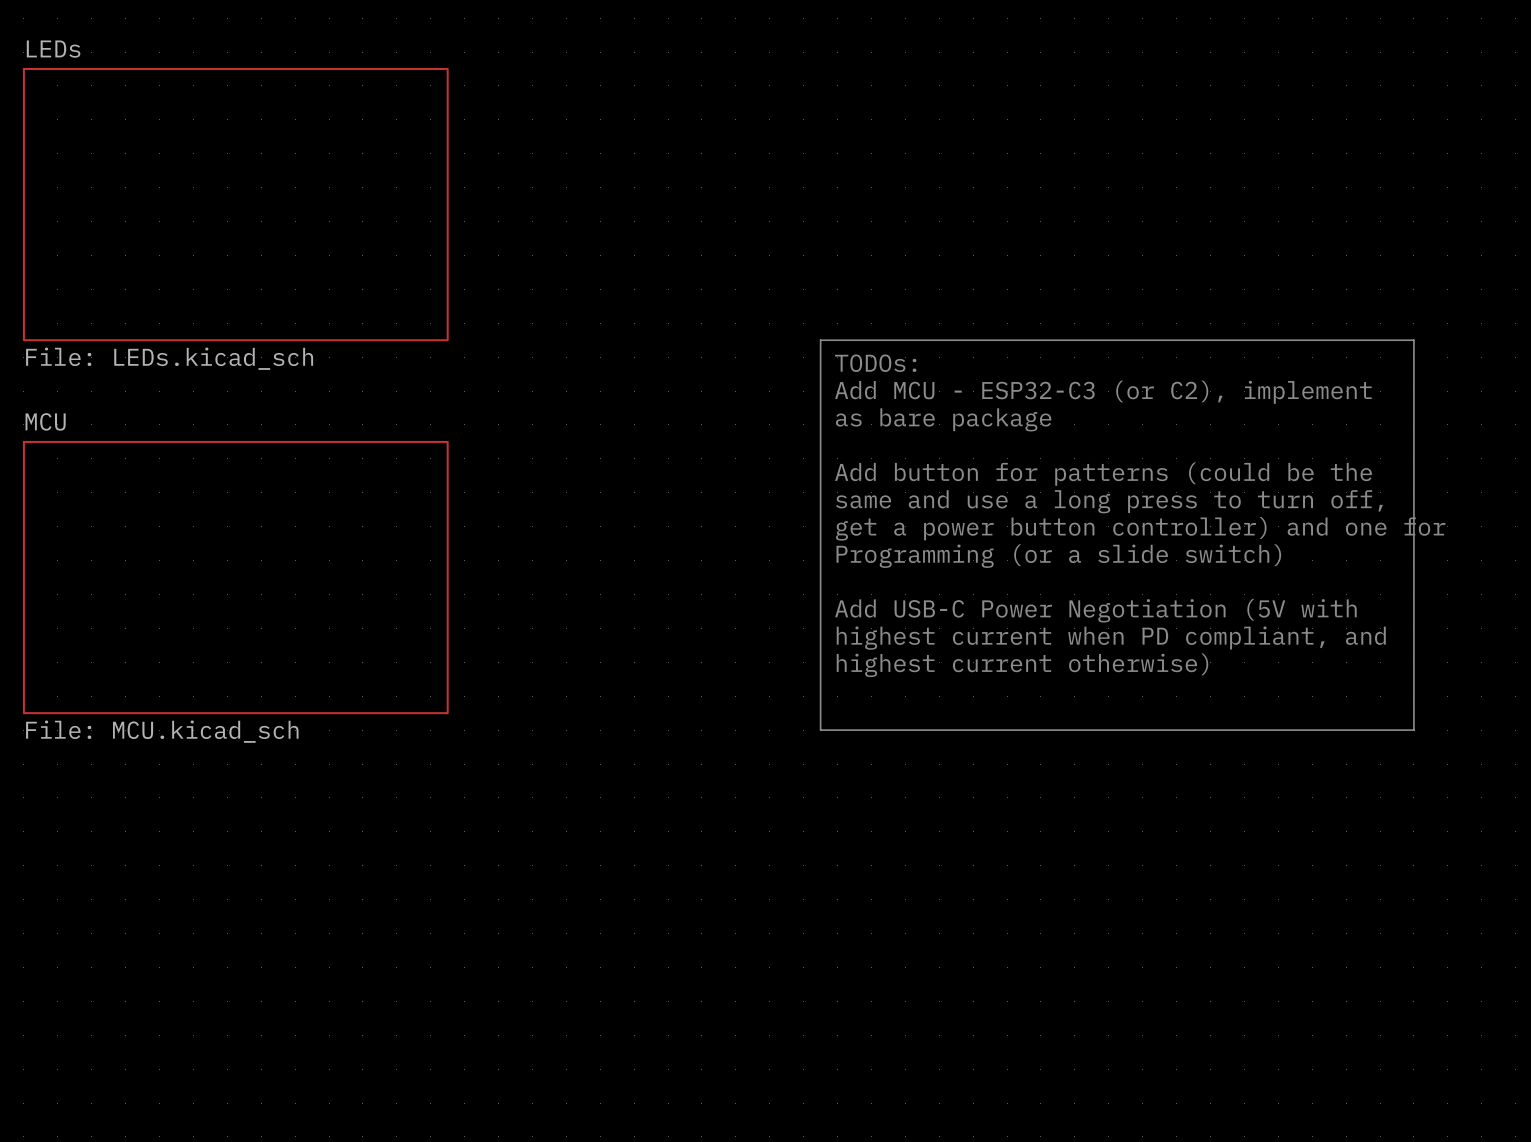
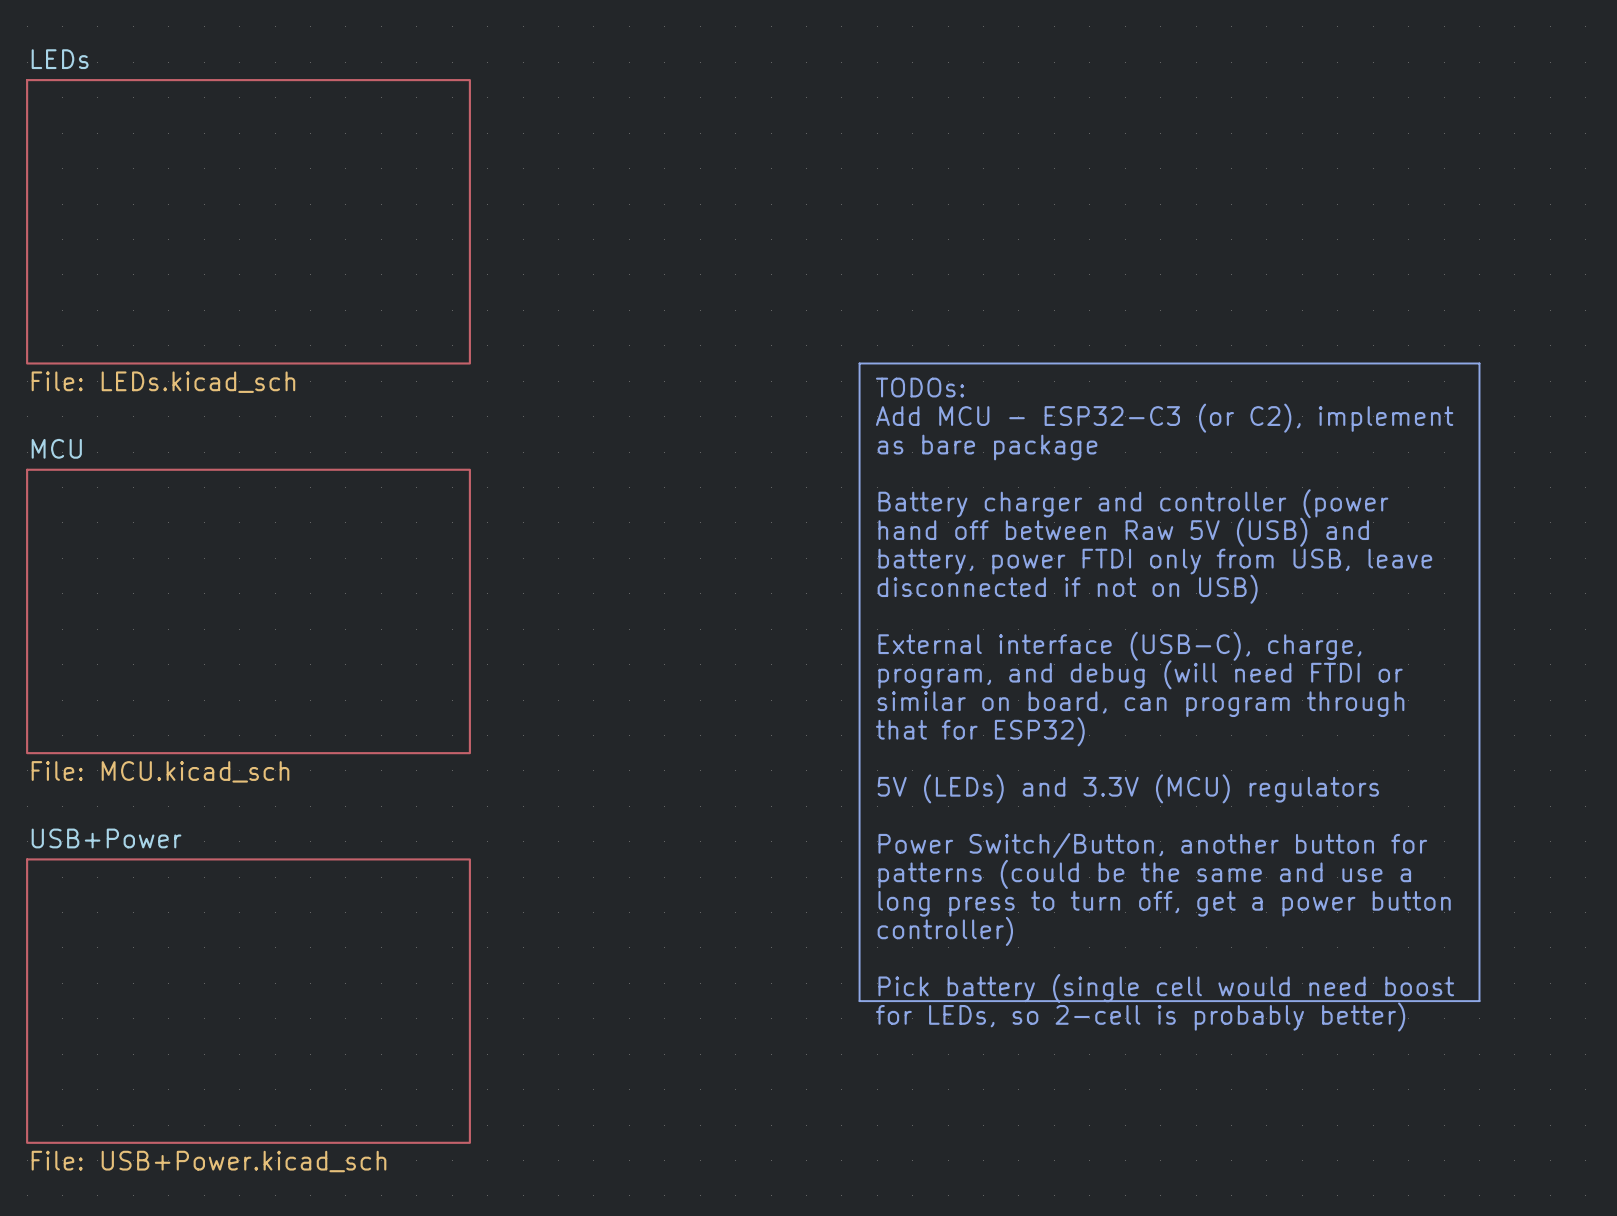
text: Add button for patterns (could be the (1103, 474) -> Battery charger and controller (power (1133, 503)
text: same and use a long press to turn off, (1109, 501) -> hand off between Raw 5V (USB) and (1123, 532)
text: get a power button controller) and one for (1140, 528) -> battery, power FTDI only from USB, leave (1155, 561)
text: Programming (or a slide switch) (1058, 556) -> disconnected if not on USB) (1067, 589)
text: Add USB-C Power Negotiation (5V with (1095, 610) -> External interface (USB-C), charge, (1119, 646)
text: highest current when PD compliant, and (1111, 638) -> program, and debug (will need FTDI or (1140, 674)
text: highest current otherwise) (1022, 665) -> similar on board, can program through (1140, 704)
text: none -> that for ESP32) (980, 731)
line: (820, 730) (1413, 730) -> (859, 770) (859, 1001) (1479, 1001) (1479, 770)
text: none -> 5V (LEDs) and 3.3V (MCU) regulators (1128, 788)
text: none -> Power Switch/Button, another button for (1152, 845)
text: none -> patterns (could be the same and use a (1144, 874)
text: none -> long press to turn off, get a power button (1164, 903)
text: none -> controller) (945, 931)
text: none -> Pick battery (single cell would need boost (1166, 988)
sheet USB+Power: none -> File: USB+Power.kicad_sch (248, 1001)
text: none -> for LEDs, so 2-cell is probably better) (1140, 1017)

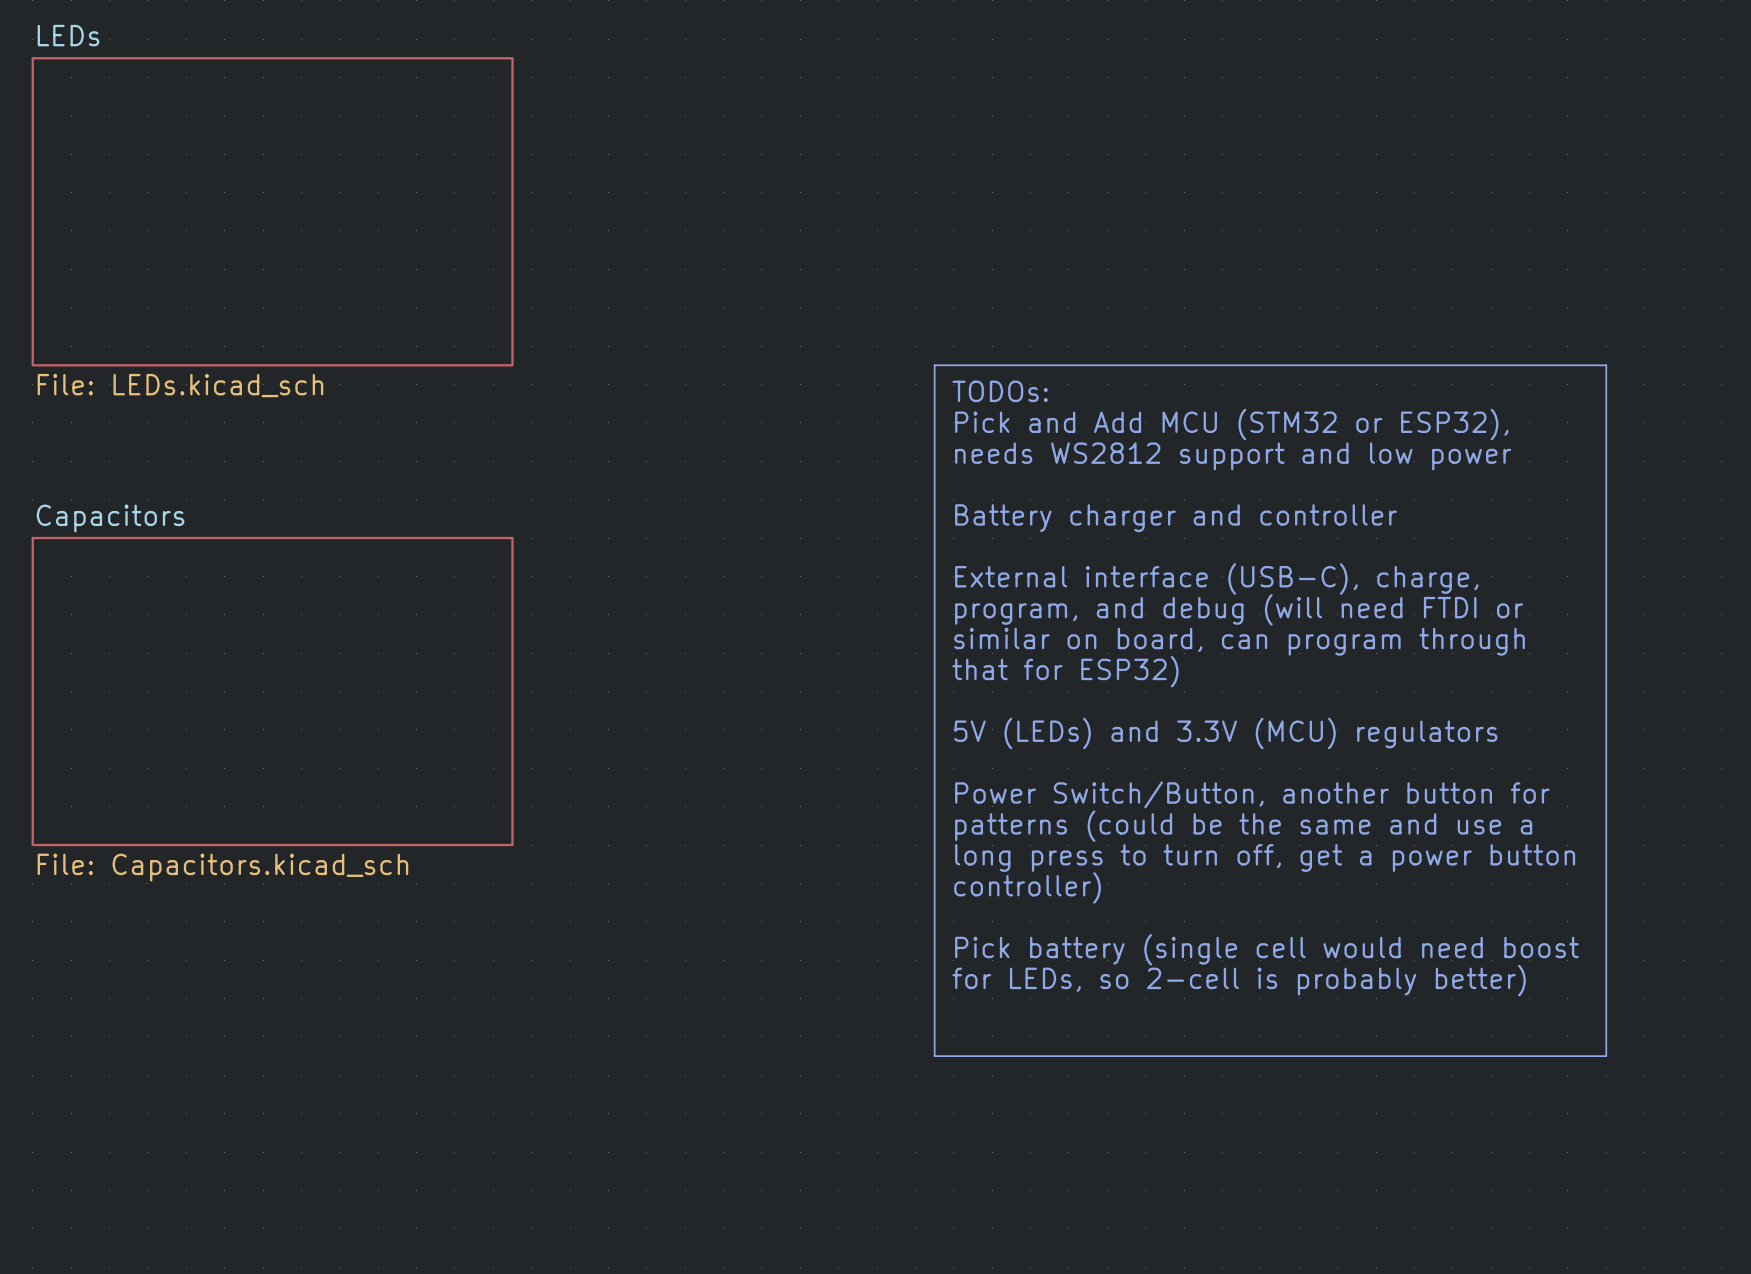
text: Add MCU - ESP32-C3 (or C2), implement (1164, 418) -> Pick and Add MCU (STM32 or ESP32), (1231, 424)
text: as bare package (987, 447) -> needs WS2812 support and low power (1233, 456)
text: Battery charger and controller (power (1133, 503) -> Battery charger and controller (1176, 518)
text: hand off between Raw 5V (USB) and (1123, 532) -> none
text: battery, power FTDI only from USB, leave (1155, 561) -> External interface (USB-C), charge, (1216, 579)
text: disconnected if not on USB) (1067, 589) -> program, and debug (will need FTDI or (1239, 609)
sheet MCU: File: MCU.kicad_sch (248, 611) -> none
text: none -> similar on board, can program through (1239, 641)
text: External interface (USB-C), charge, (1119, 646) -> that for ESP32) (1065, 671)
sheet Capacitors: none -> File: Capacitors.kicad_sch (272, 691)
text: program, and debug (will need FTDI or (1140, 674) -> none
text: similar on board, can program through (1140, 704) -> 5V (LEDs) and 3.3V (MCU) regulators (1225, 733)
text: that for ESP32) (980, 731) -> none
text: none -> Power Switch/Button, another button for (1252, 794)
text: 5V (LEDs) and 3.3V (MCU) regulators (1128, 788) -> patterns (could be the same and use a (1243, 826)
text: none -> long press to turn off, get a power button (1265, 857)
text: Power Switch/Button, another button for (1152, 845) -> controller) (1027, 887)
text: patterns (could be the same and use a (1144, 874) -> none
text: long press to turn off, get a power button (1164, 903) -> Pick battery (single cell would need boost (1266, 949)
text: controller) (945, 931) -> for LEDs, so 2-cell is probably better) (1239, 980)
text: Pick battery (single cell would need boost (1166, 988) -> none
sheet USB+Power: File: USB+Power.kicad_sch (248, 1001) -> none
text: for LEDs, so 2-cell is probably better) (1140, 1017) -> none

